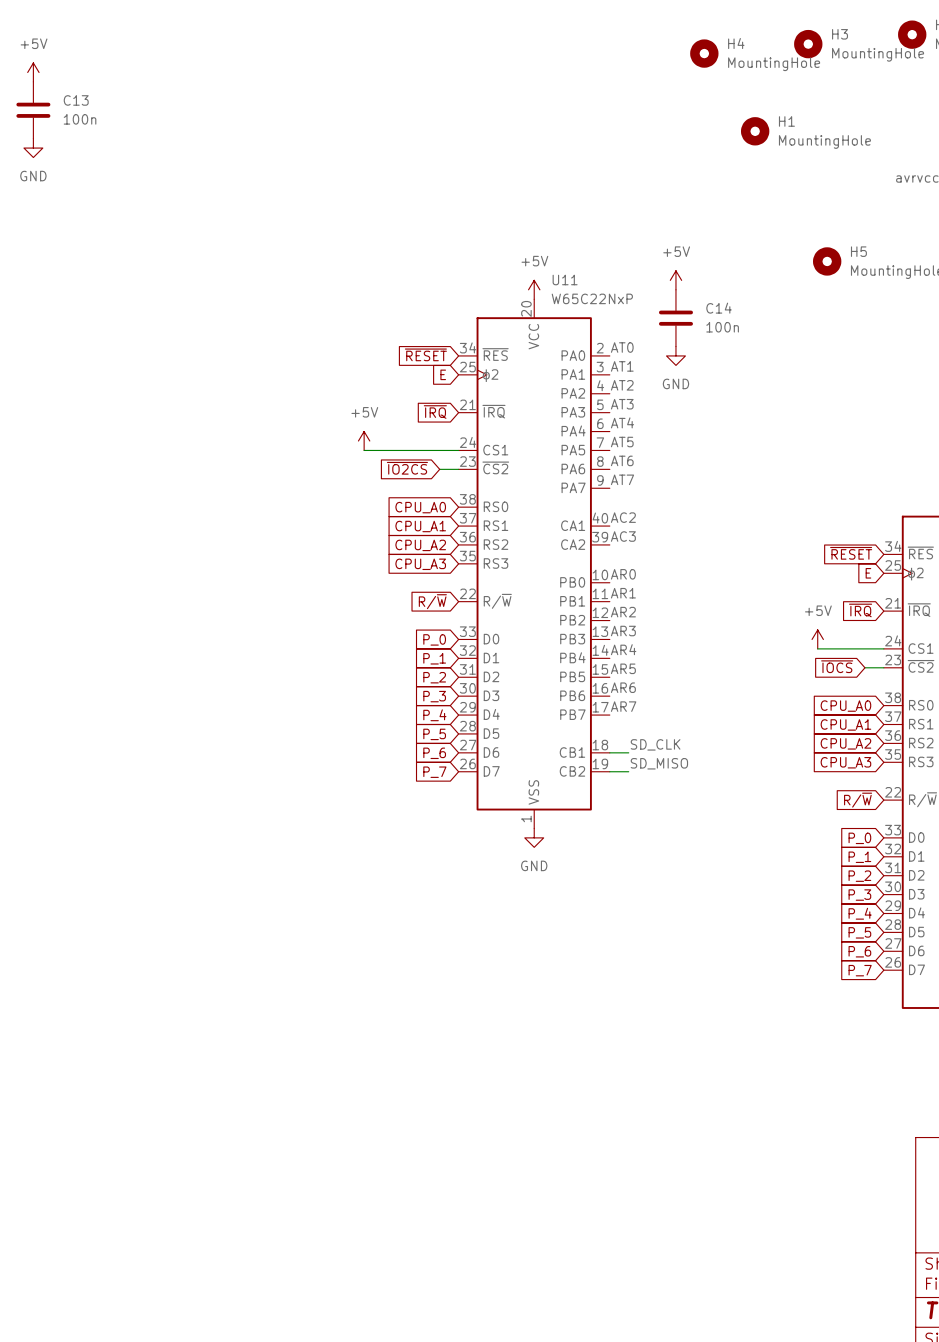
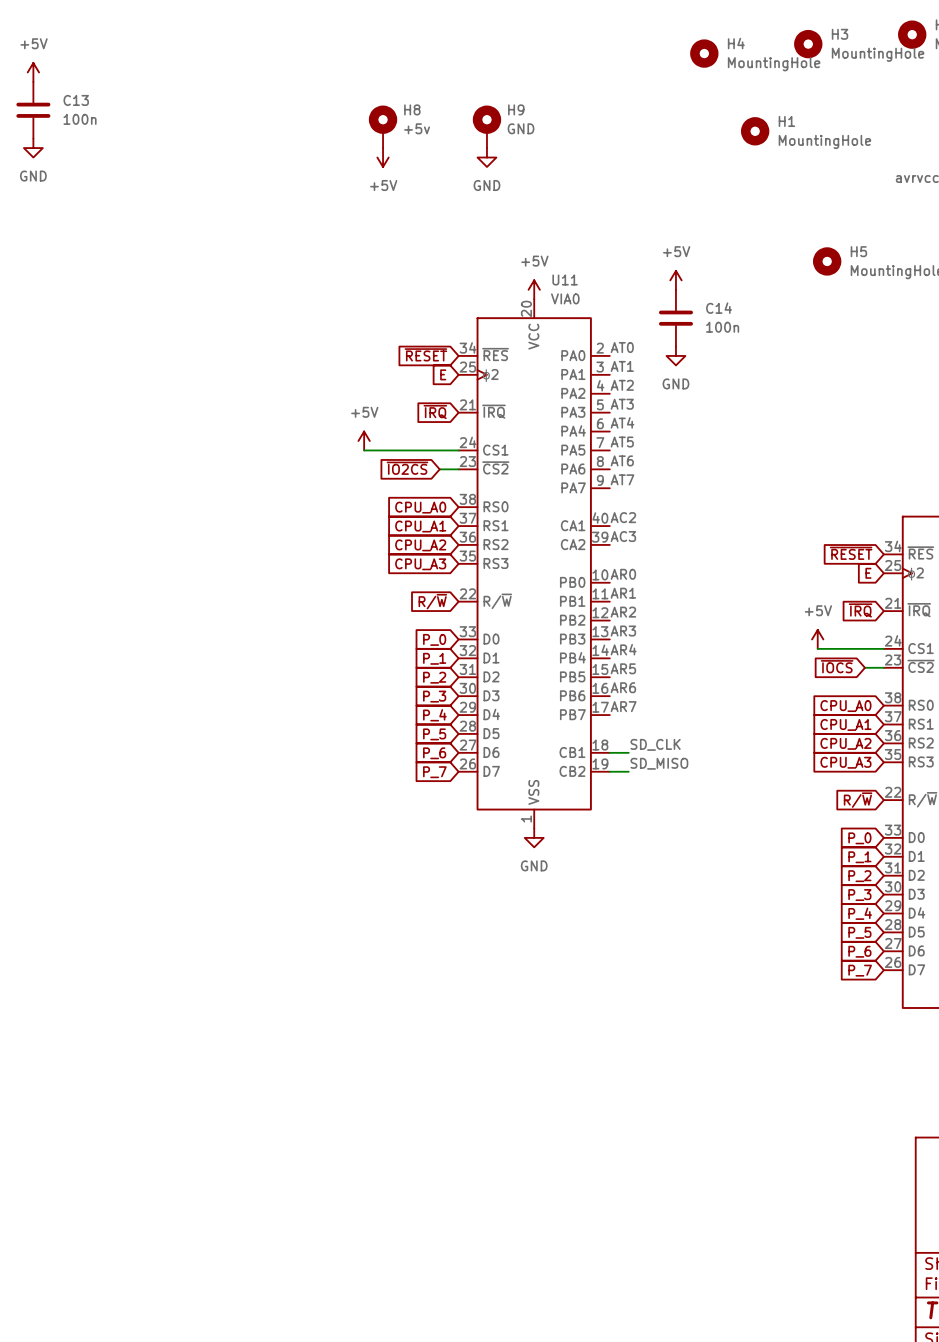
H8: none -> +5v (383, 126)
H9: none -> GND (486, 126)
power symbol: none -> +5V (383, 157)
power symbol: none -> GND (486, 157)
U11 value: W65C22NxP (592, 298) -> VIA0 (565, 298)

